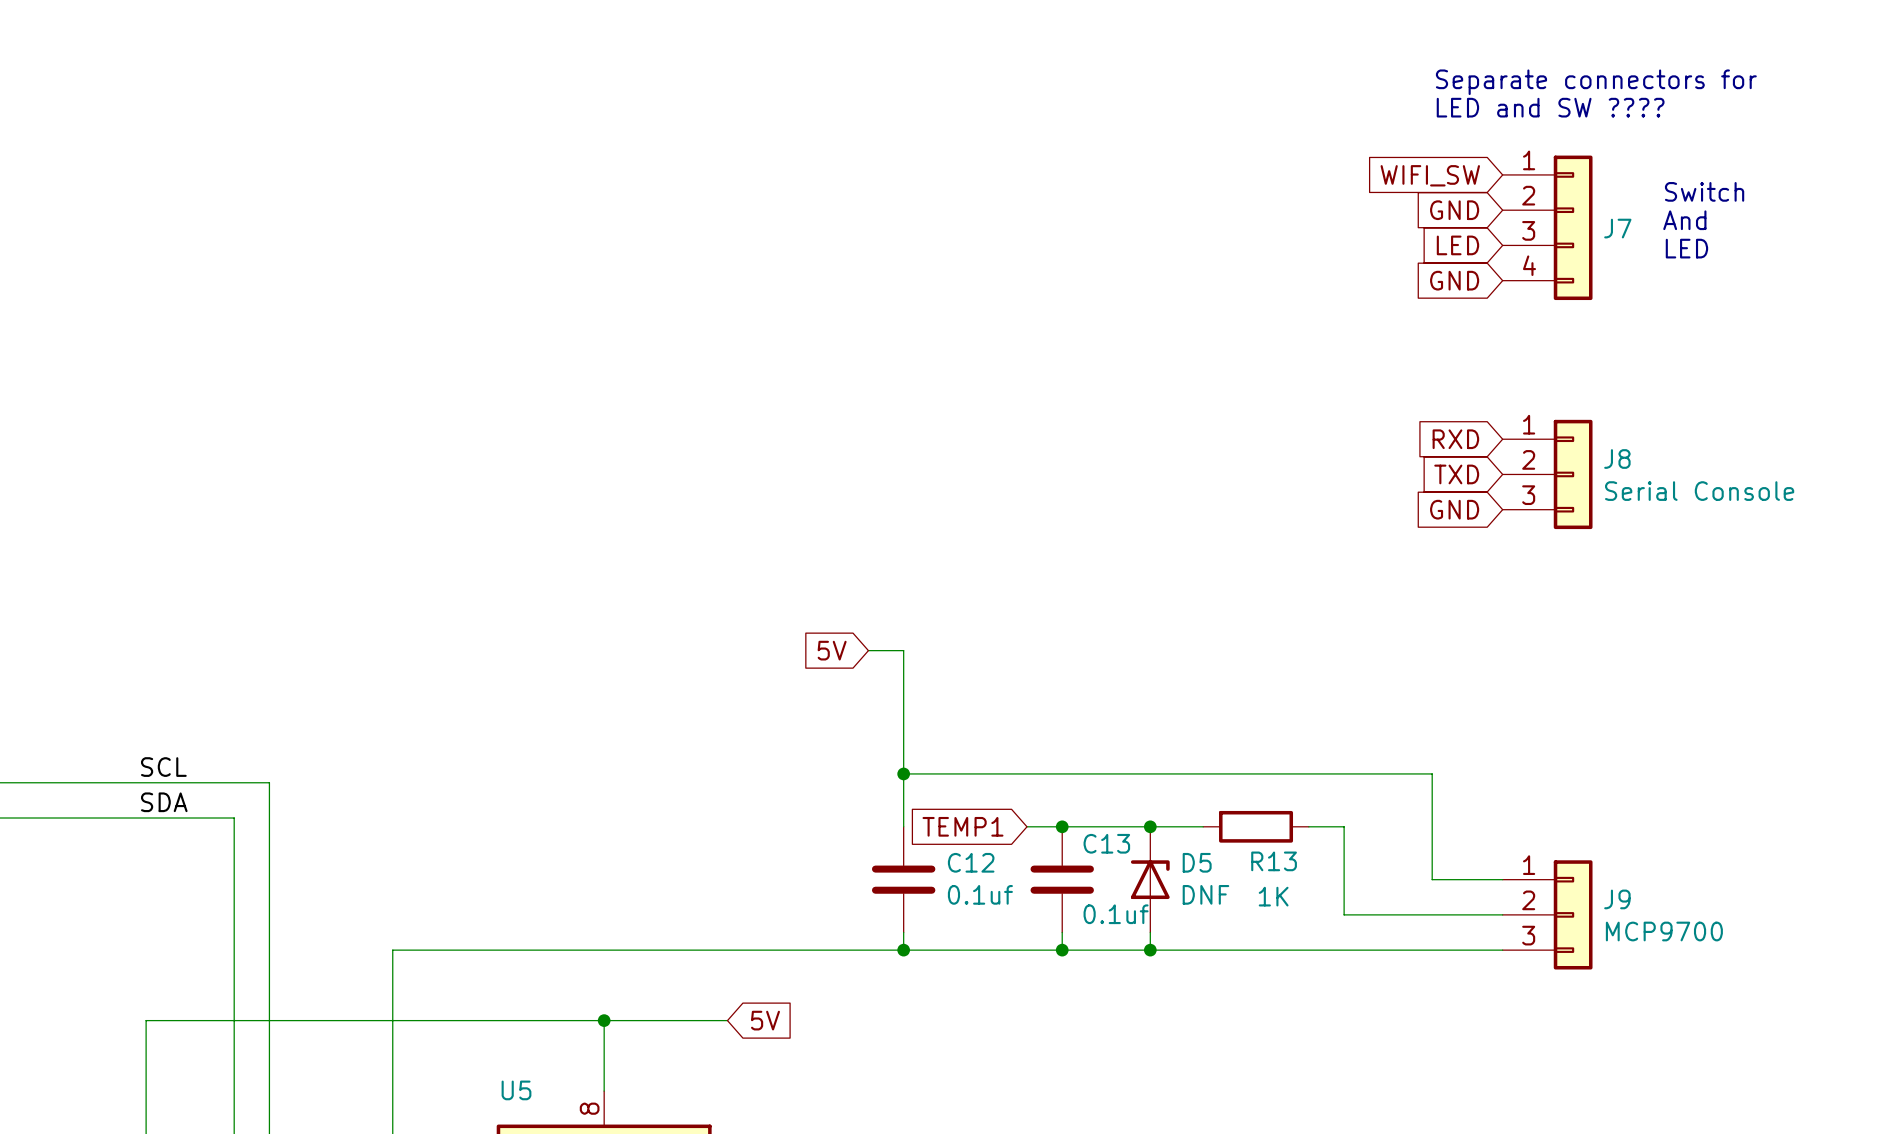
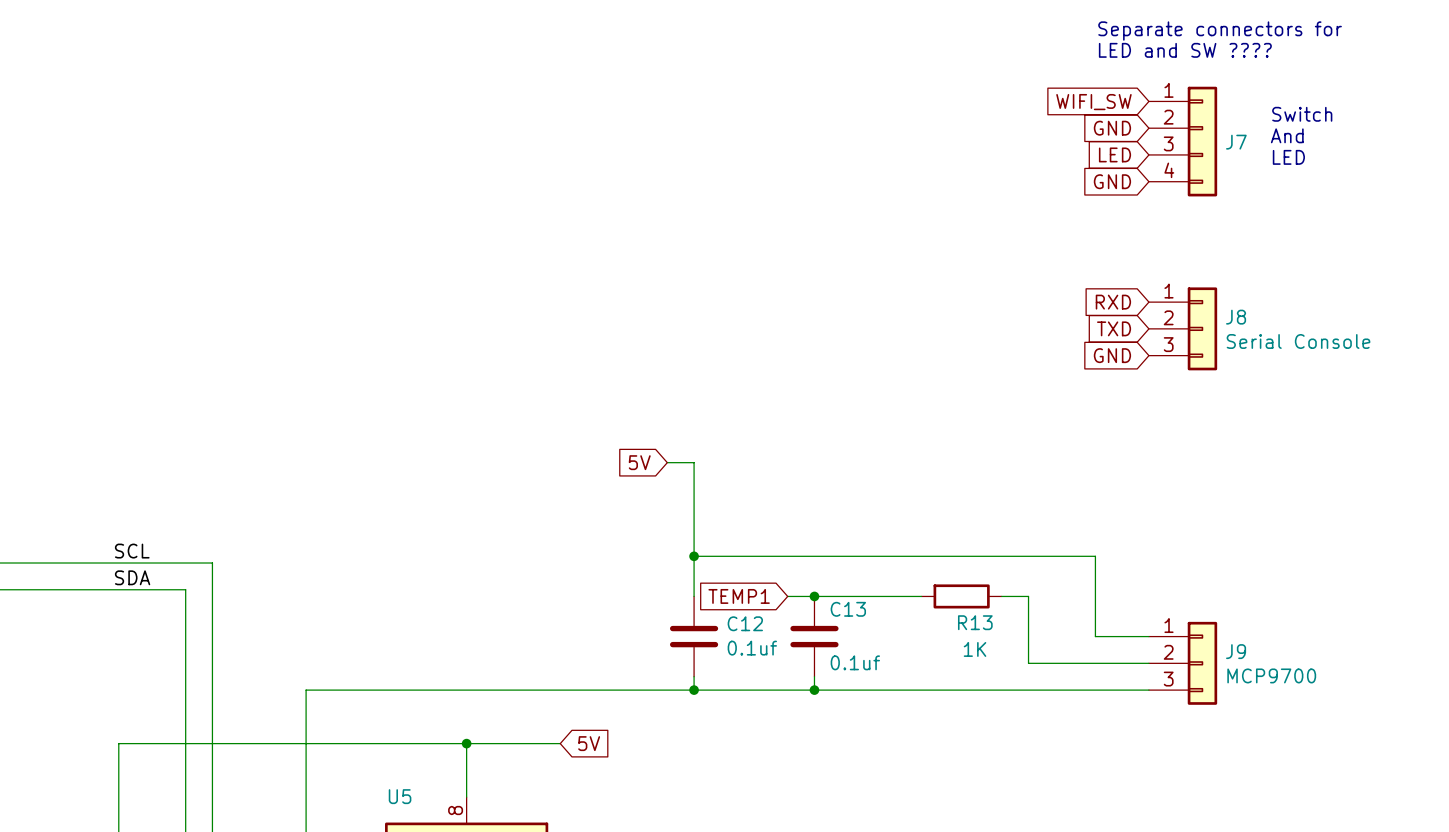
junction: (1150, 826) -> none
D5: DNF (1150, 879) -> none
wire: (1150, 932) (1150, 950) -> none
junction: (1150, 950) -> none

